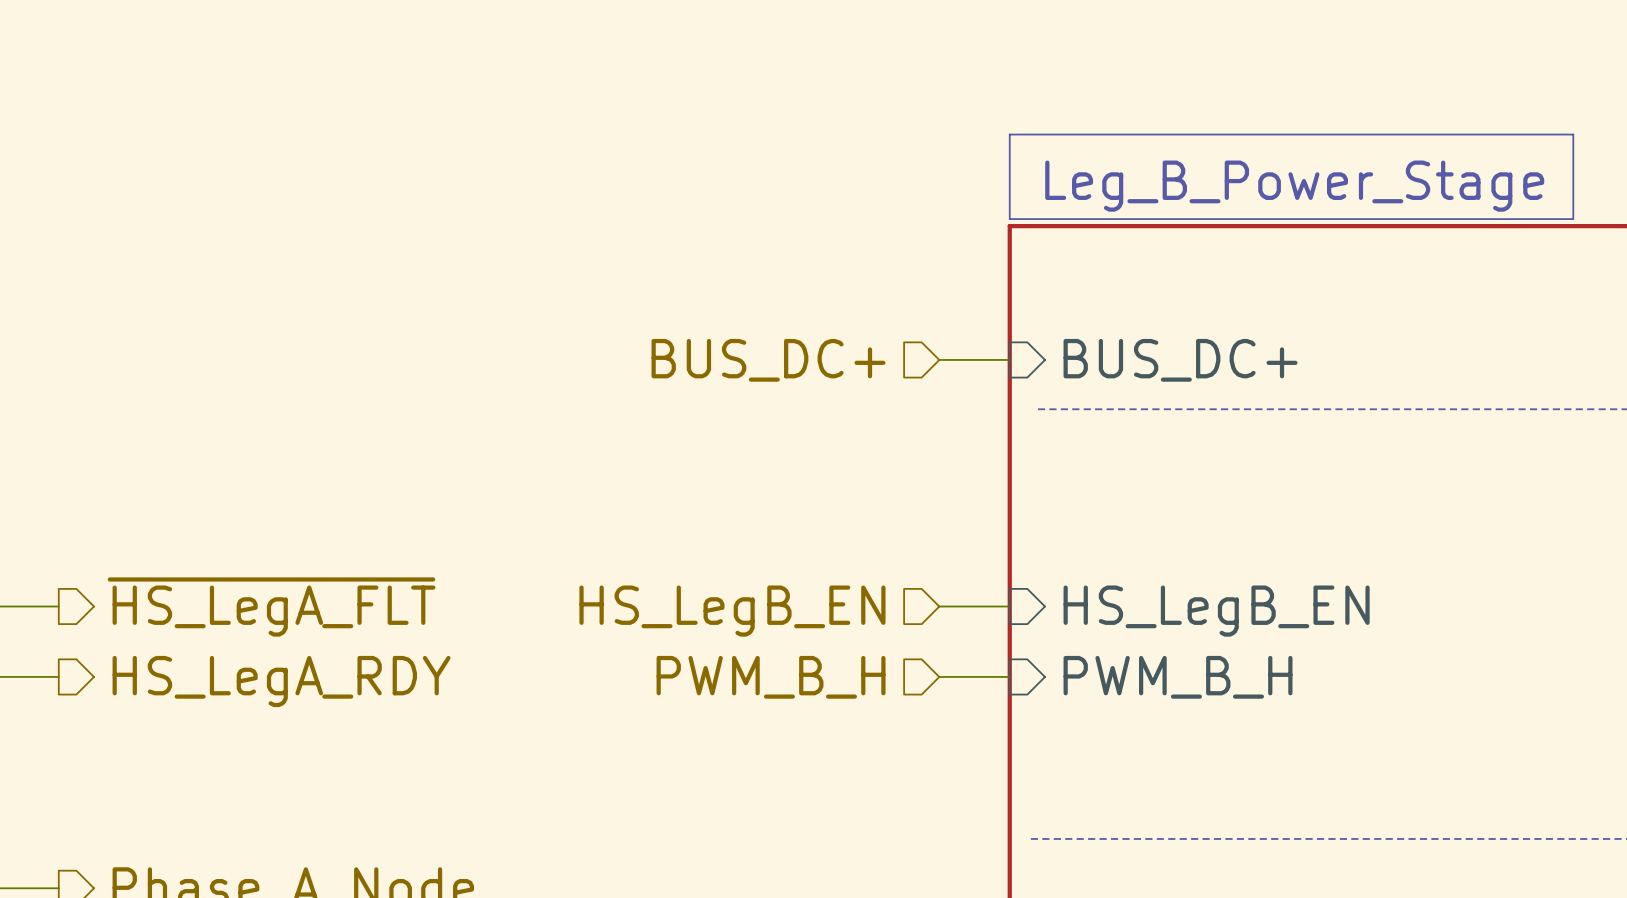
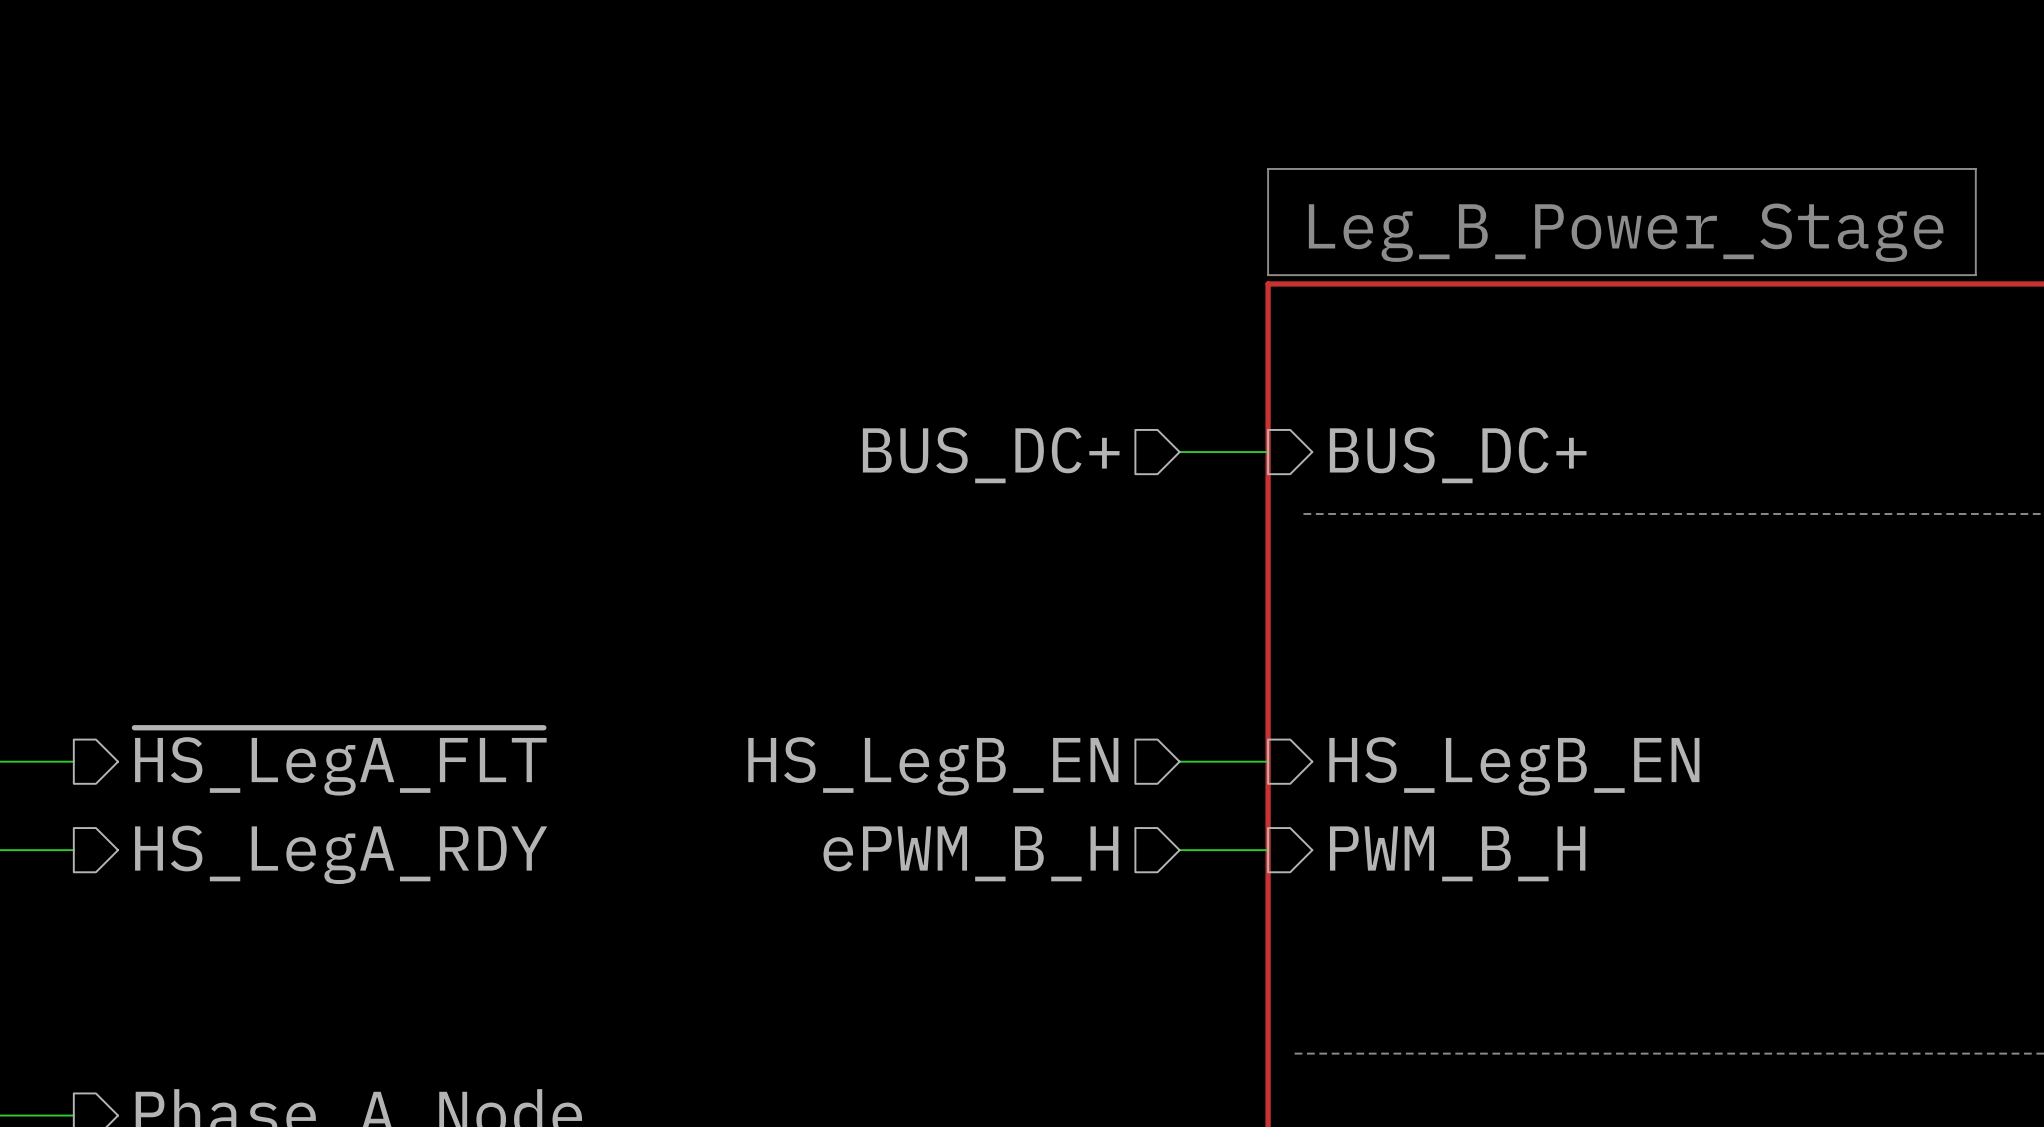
hierarchical label: PWM_B_H (771, 677) -> ePWM_B_H (970, 853)

